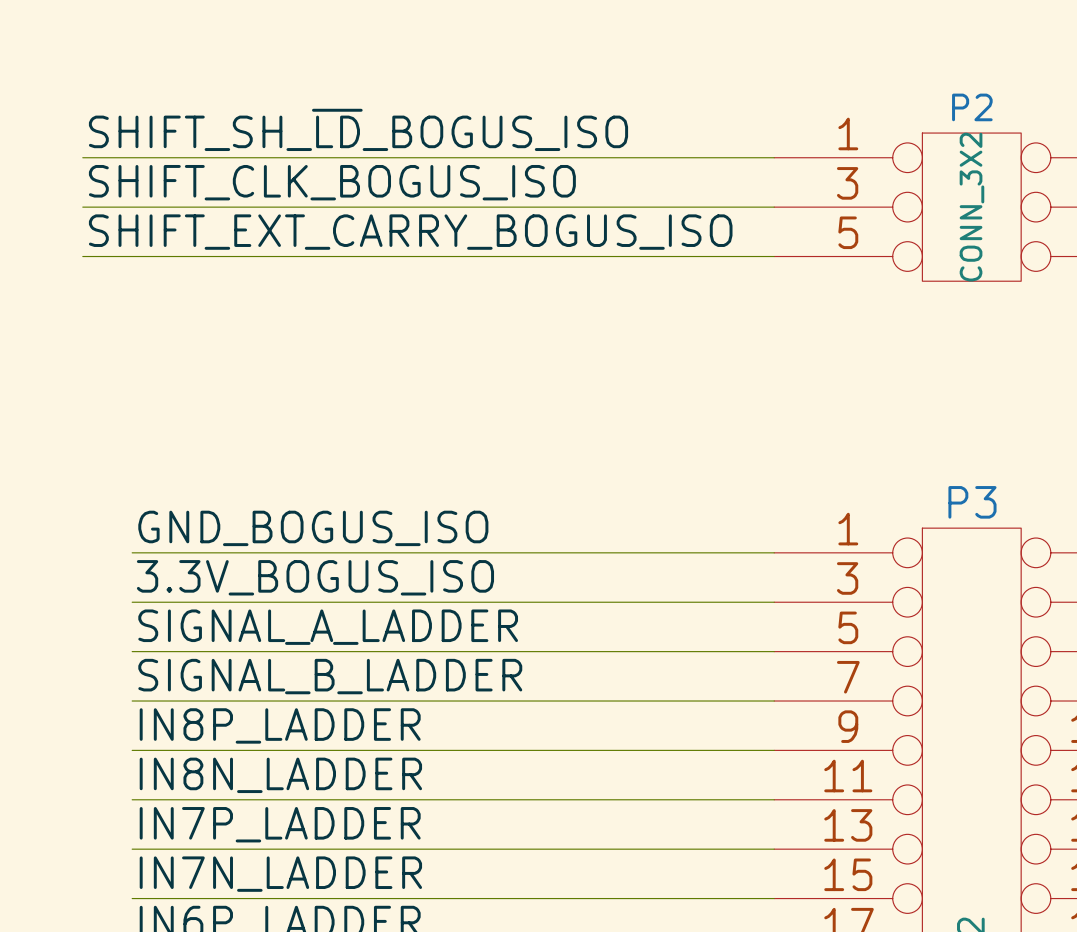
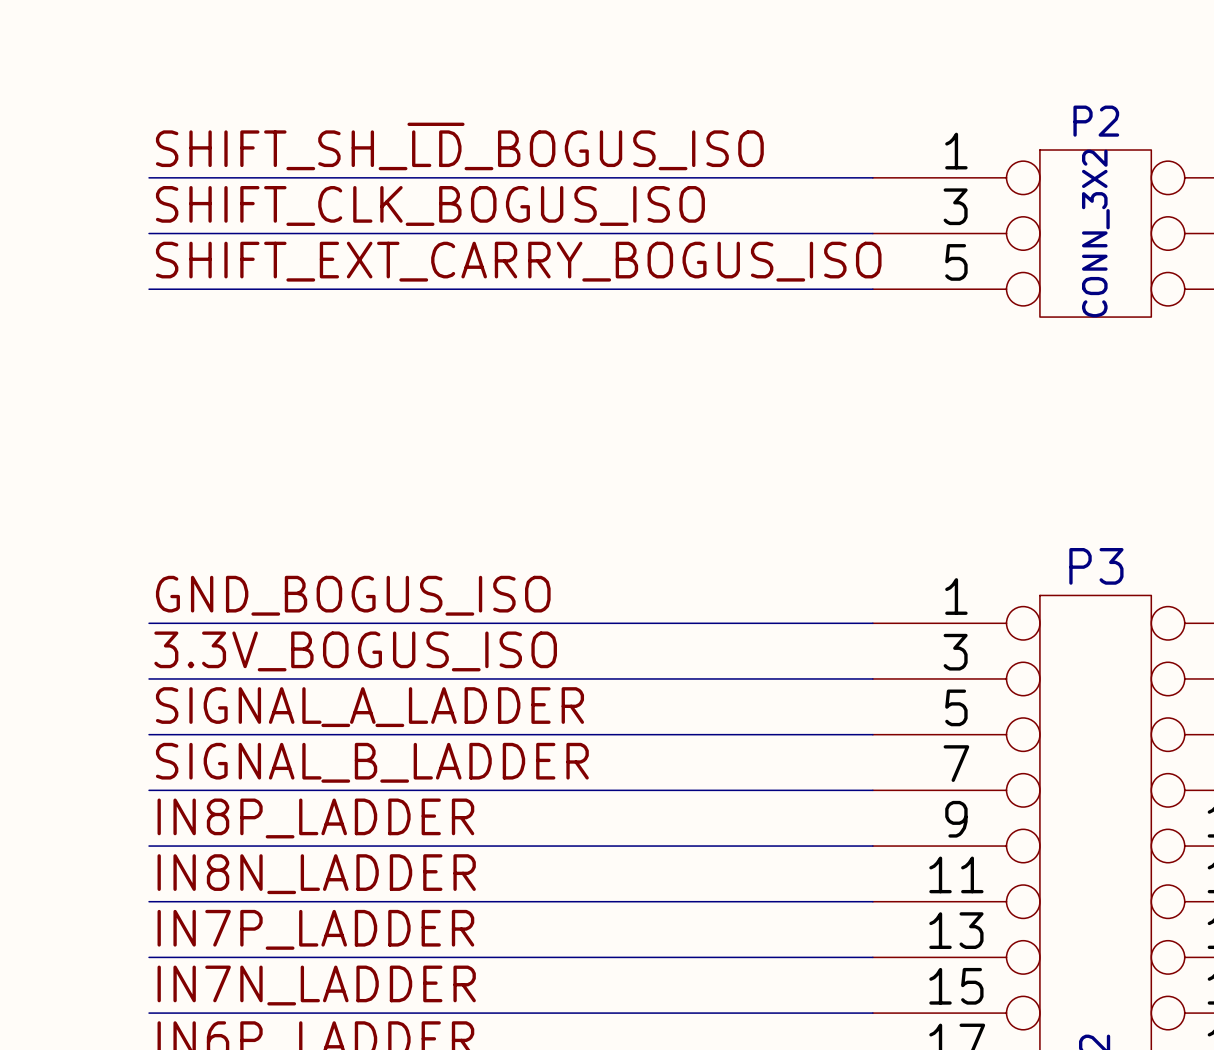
label position: SHIFT_SH_~{LD}_BOGUS_ISO (358, 129) -> SHIFT_SH_~{LD}_BOGUS_ISO (459, 146)
wire: (82, 157) (132, 157) -> none
label position: SHIFT_CLK_BOGUS_ISO (332, 182) -> SHIFT_CLK_BOGUS_ISO (430, 205)
wire: (82, 207) (132, 207) -> none
label position: SHIFT_EXT_CARRY_BOGUS_ISO (410, 232) -> SHIFT_EXT_CARRY_BOGUS_ISO (518, 261)
wire: (82, 256) (132, 256) -> none

